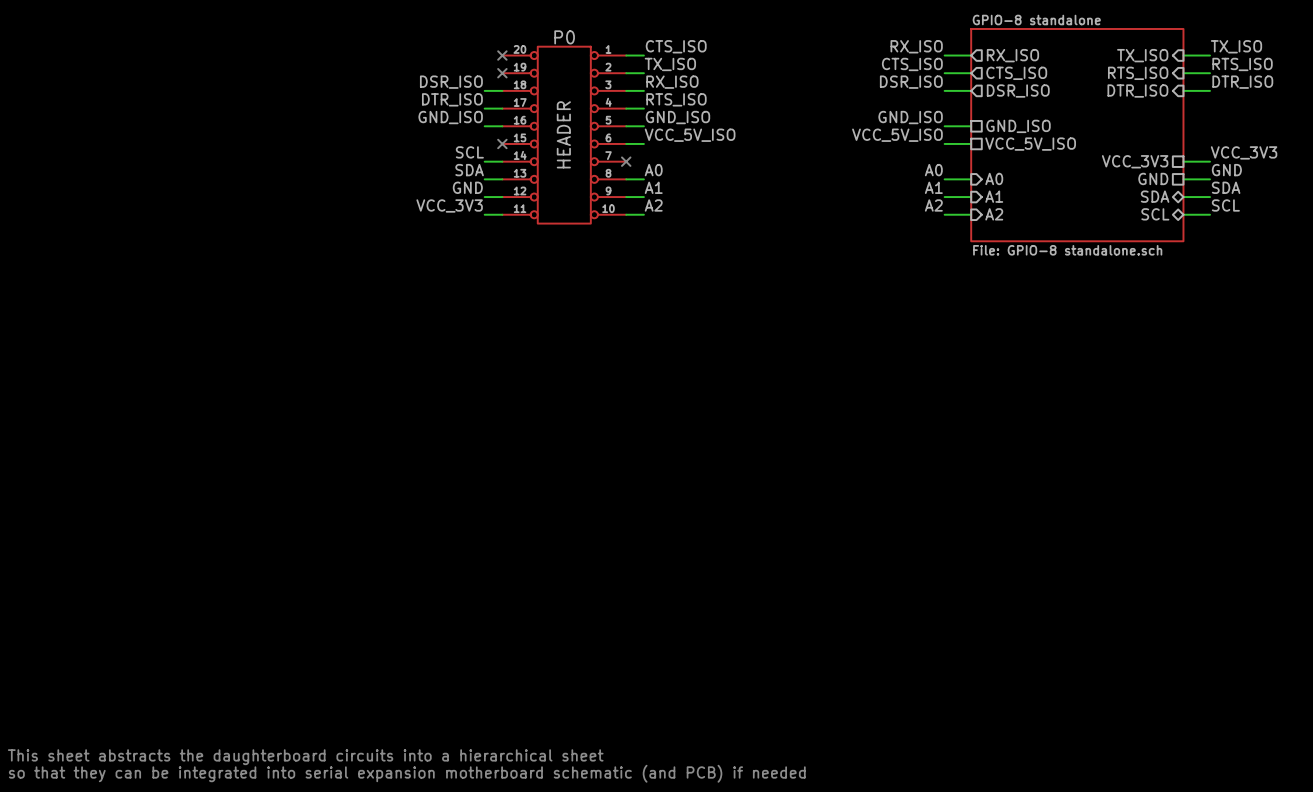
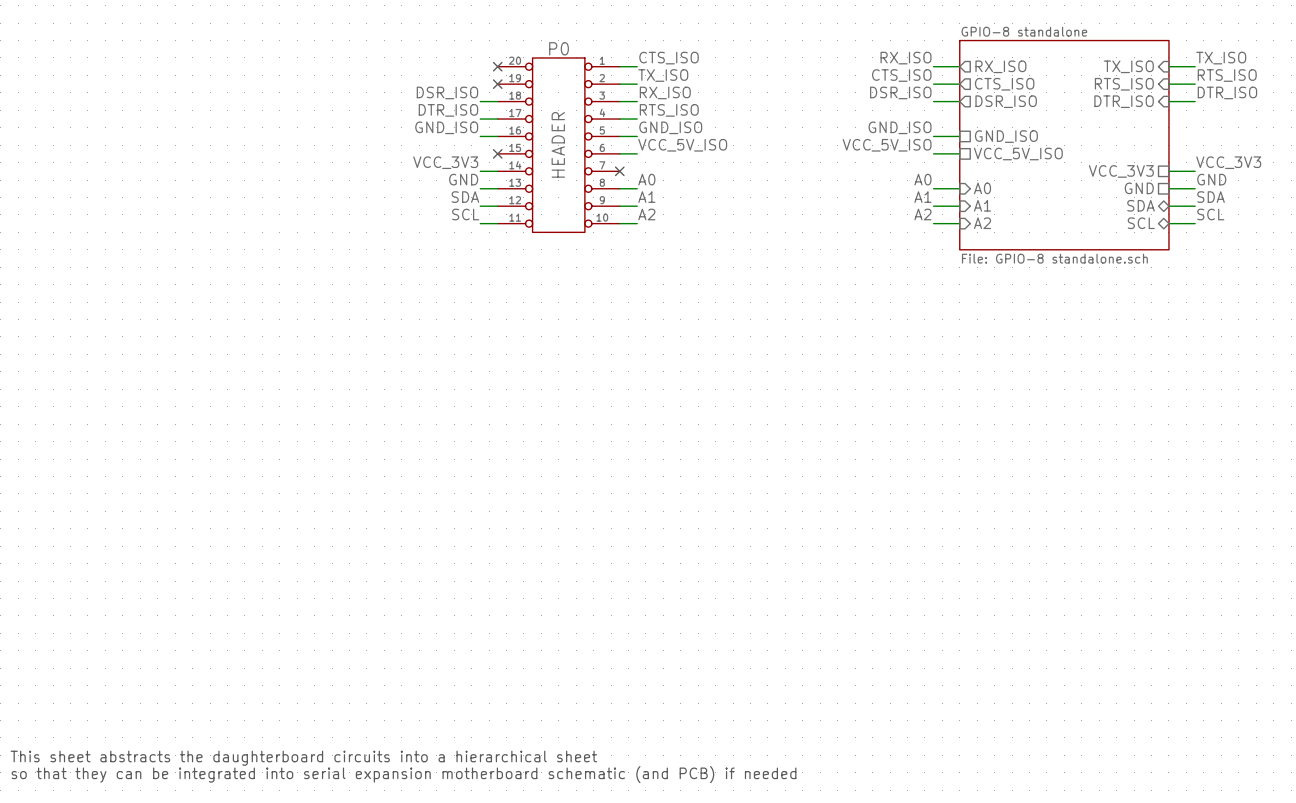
label: SCL (469, 152) -> VCC_3V3 (445, 162)
label: SDA (469, 170) -> GND (463, 179)
label: GND (467, 187) -> SDA (465, 197)
label: VCC_3V3 (449, 205) -> SCL (465, 214)

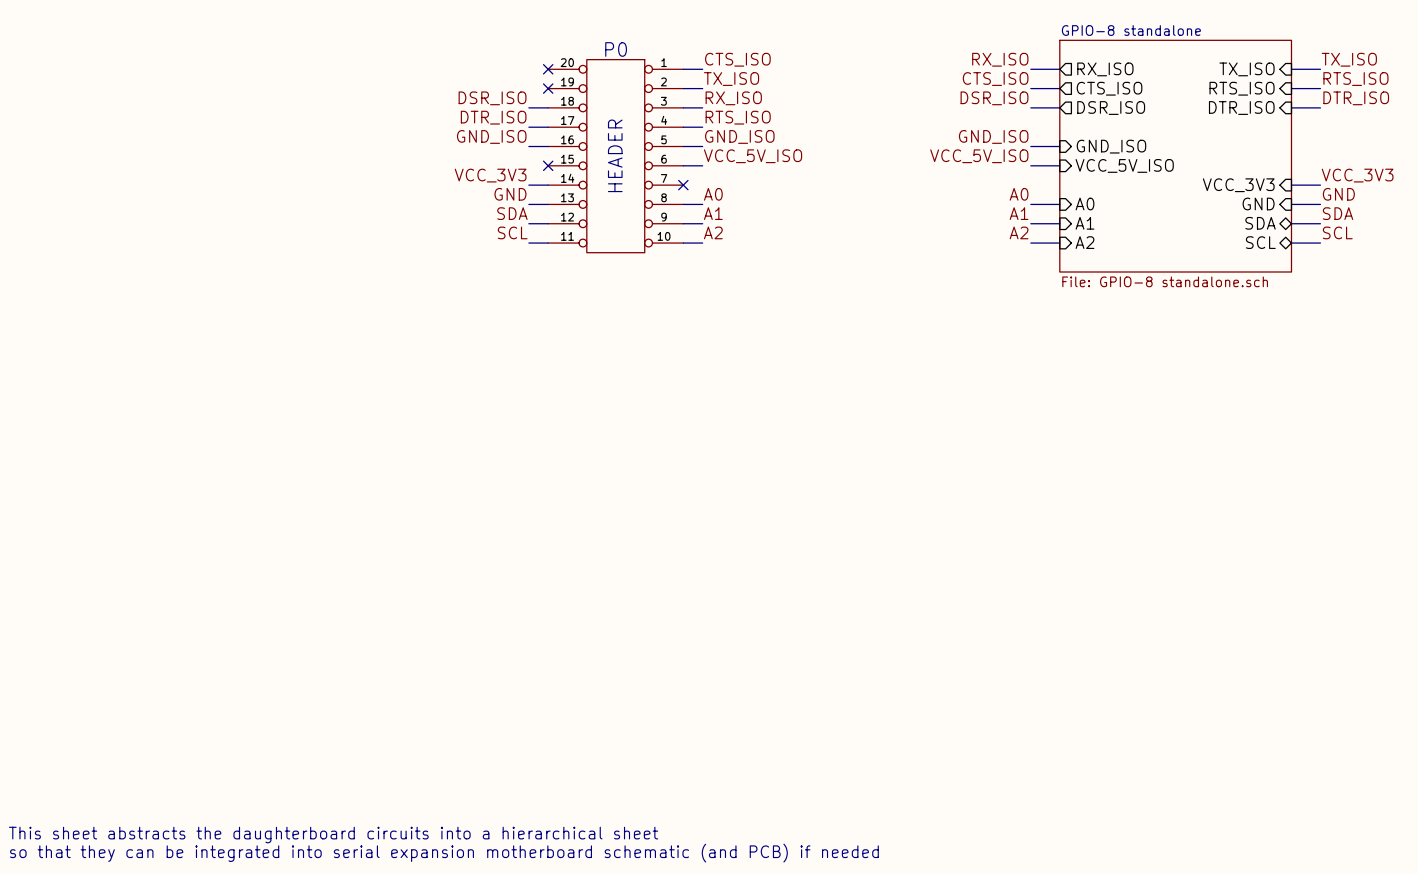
sheet pin shape: passive (1006, 136) -> input (1111, 146)
sheet pin shape: passive (1018, 153) -> input (1124, 165)
sheet pin shape: passive (1121, 171) -> input (1238, 185)
sheet pin shape: passive (1139, 188) -> input (1258, 203)

